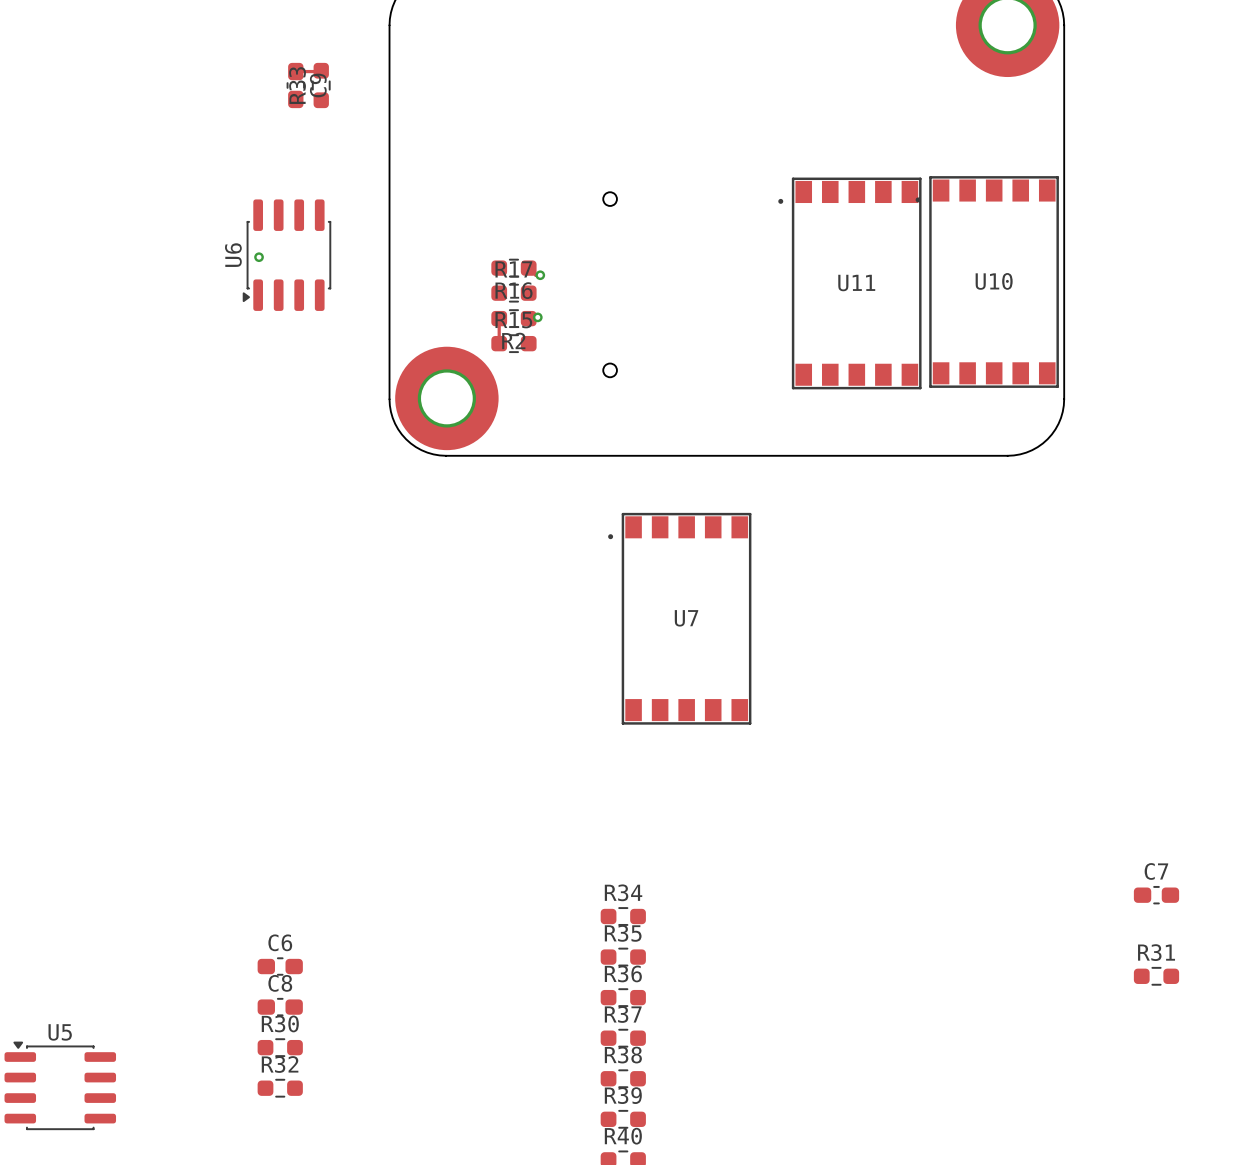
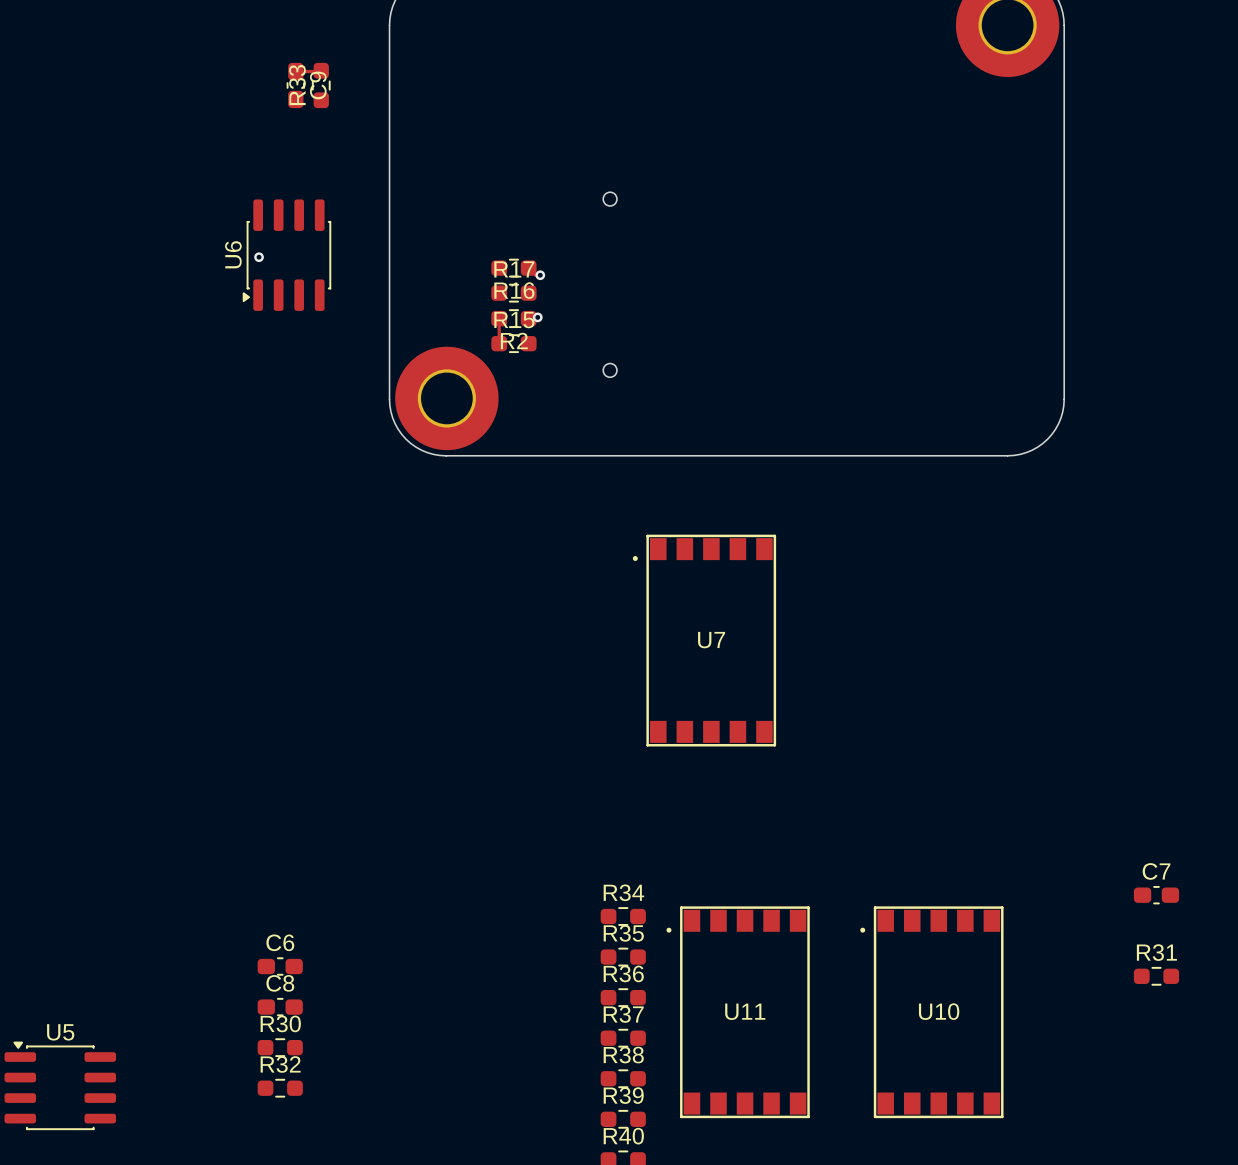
U10 position: (987, 282) -> (931, 1012)
U11 position: (849, 283) -> (738, 1012)
U7 position: (679, 618) -> (704, 640)

